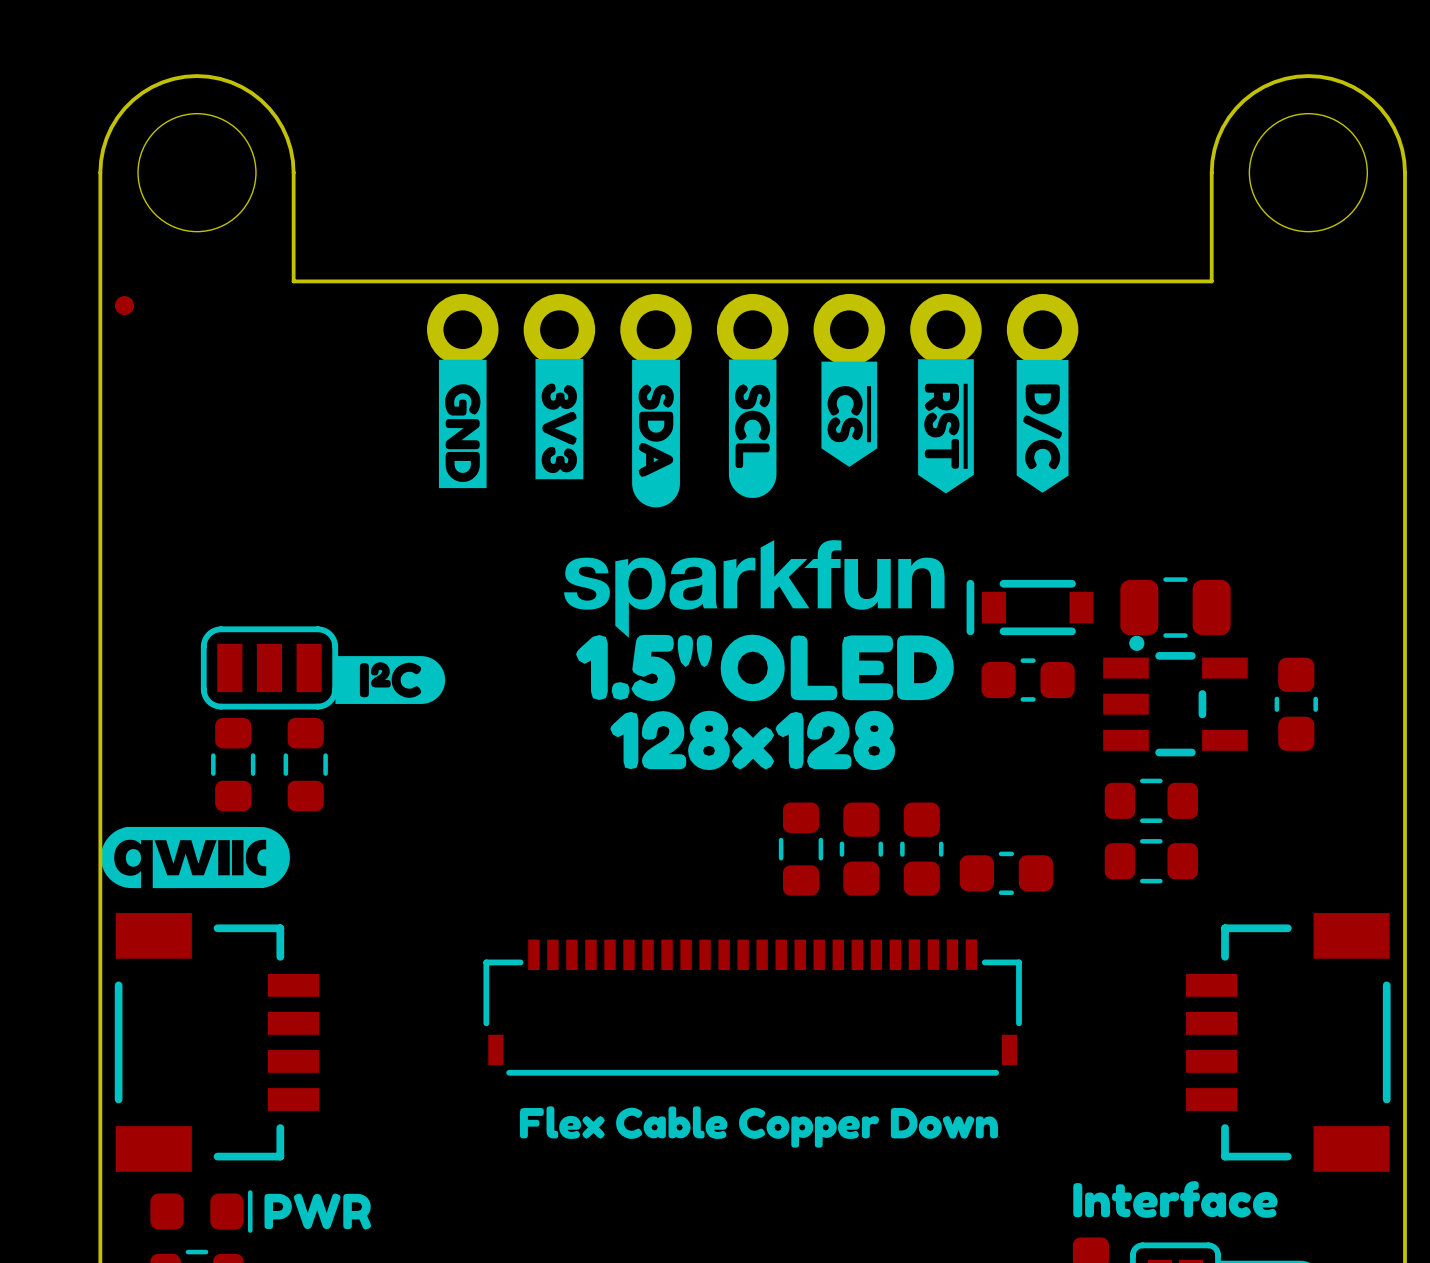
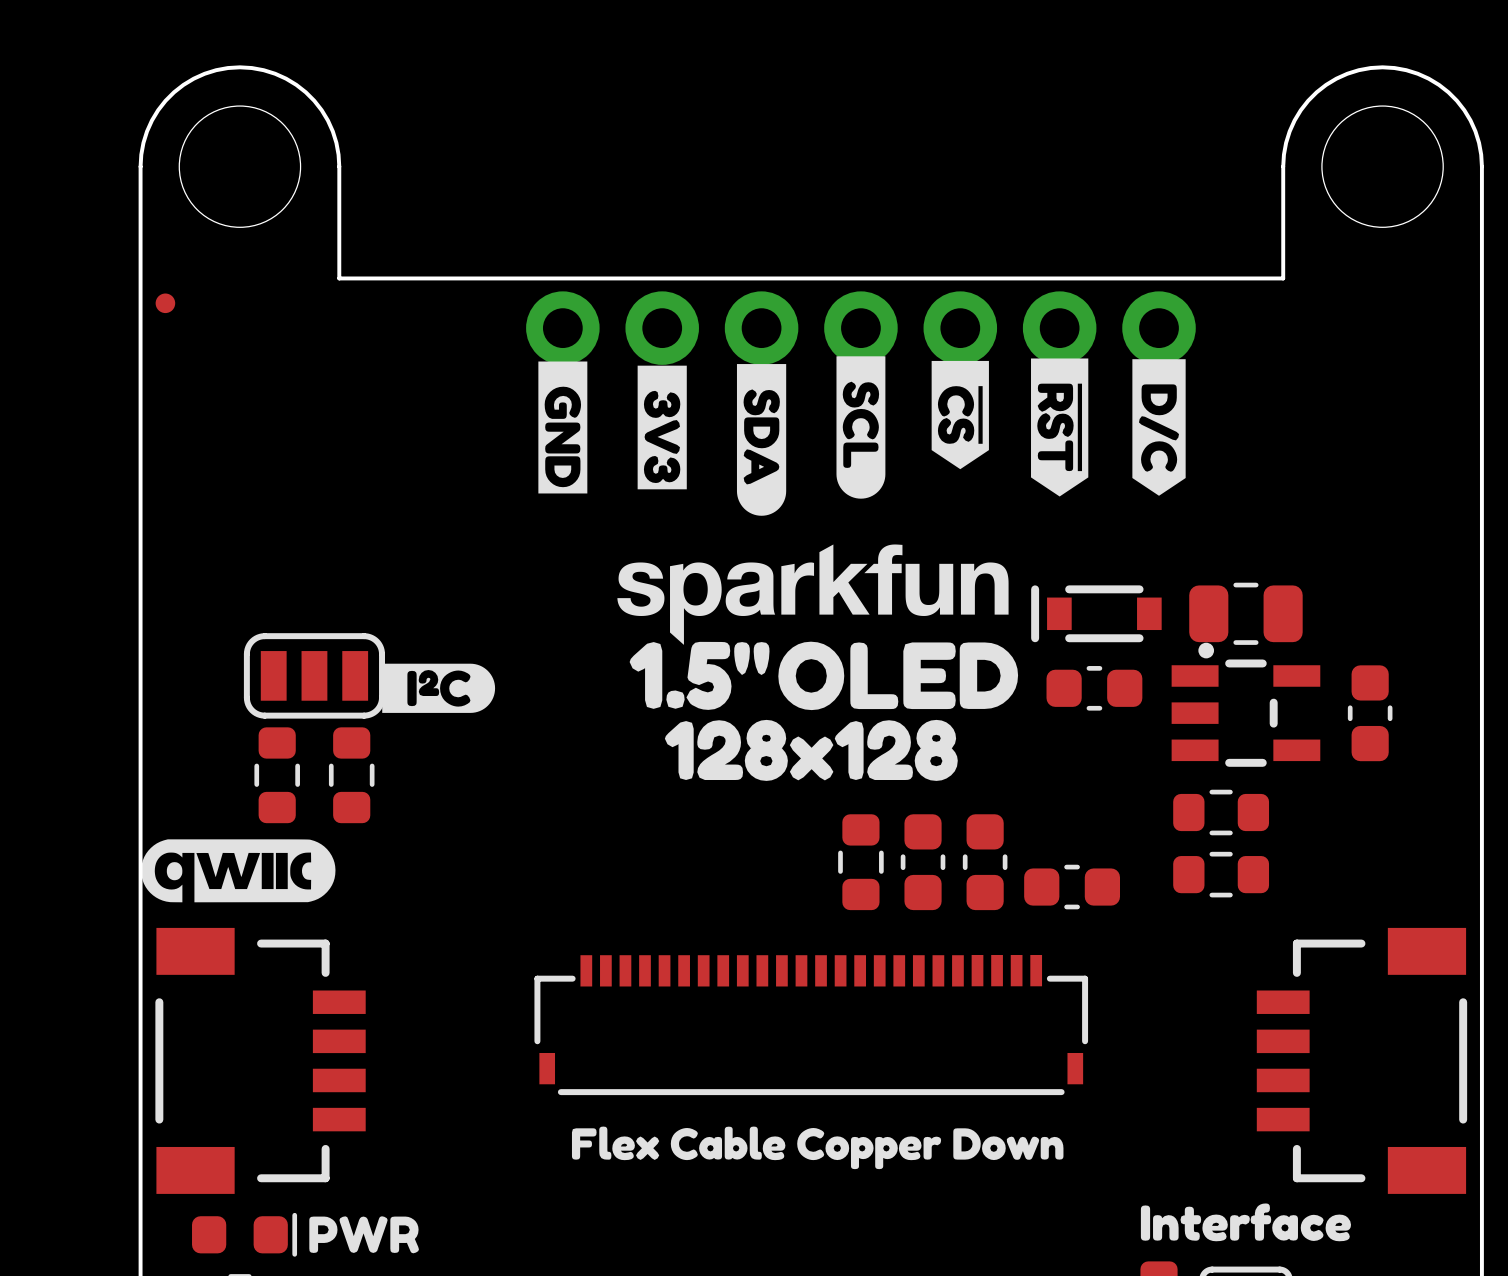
part position: (752, 329) -> (860, 328)
drawing position: (849, 414) -> (960, 415)
drawing position: (559, 419) -> (662, 427)
drawing position: (462, 423) -> (562, 427)
drawing position: (945, 426) -> (1059, 427)
drawing position: (1042, 426) -> (1159, 427)
drawing position: (752, 428) -> (860, 427)
drawing position: (656, 433) -> (761, 439)

